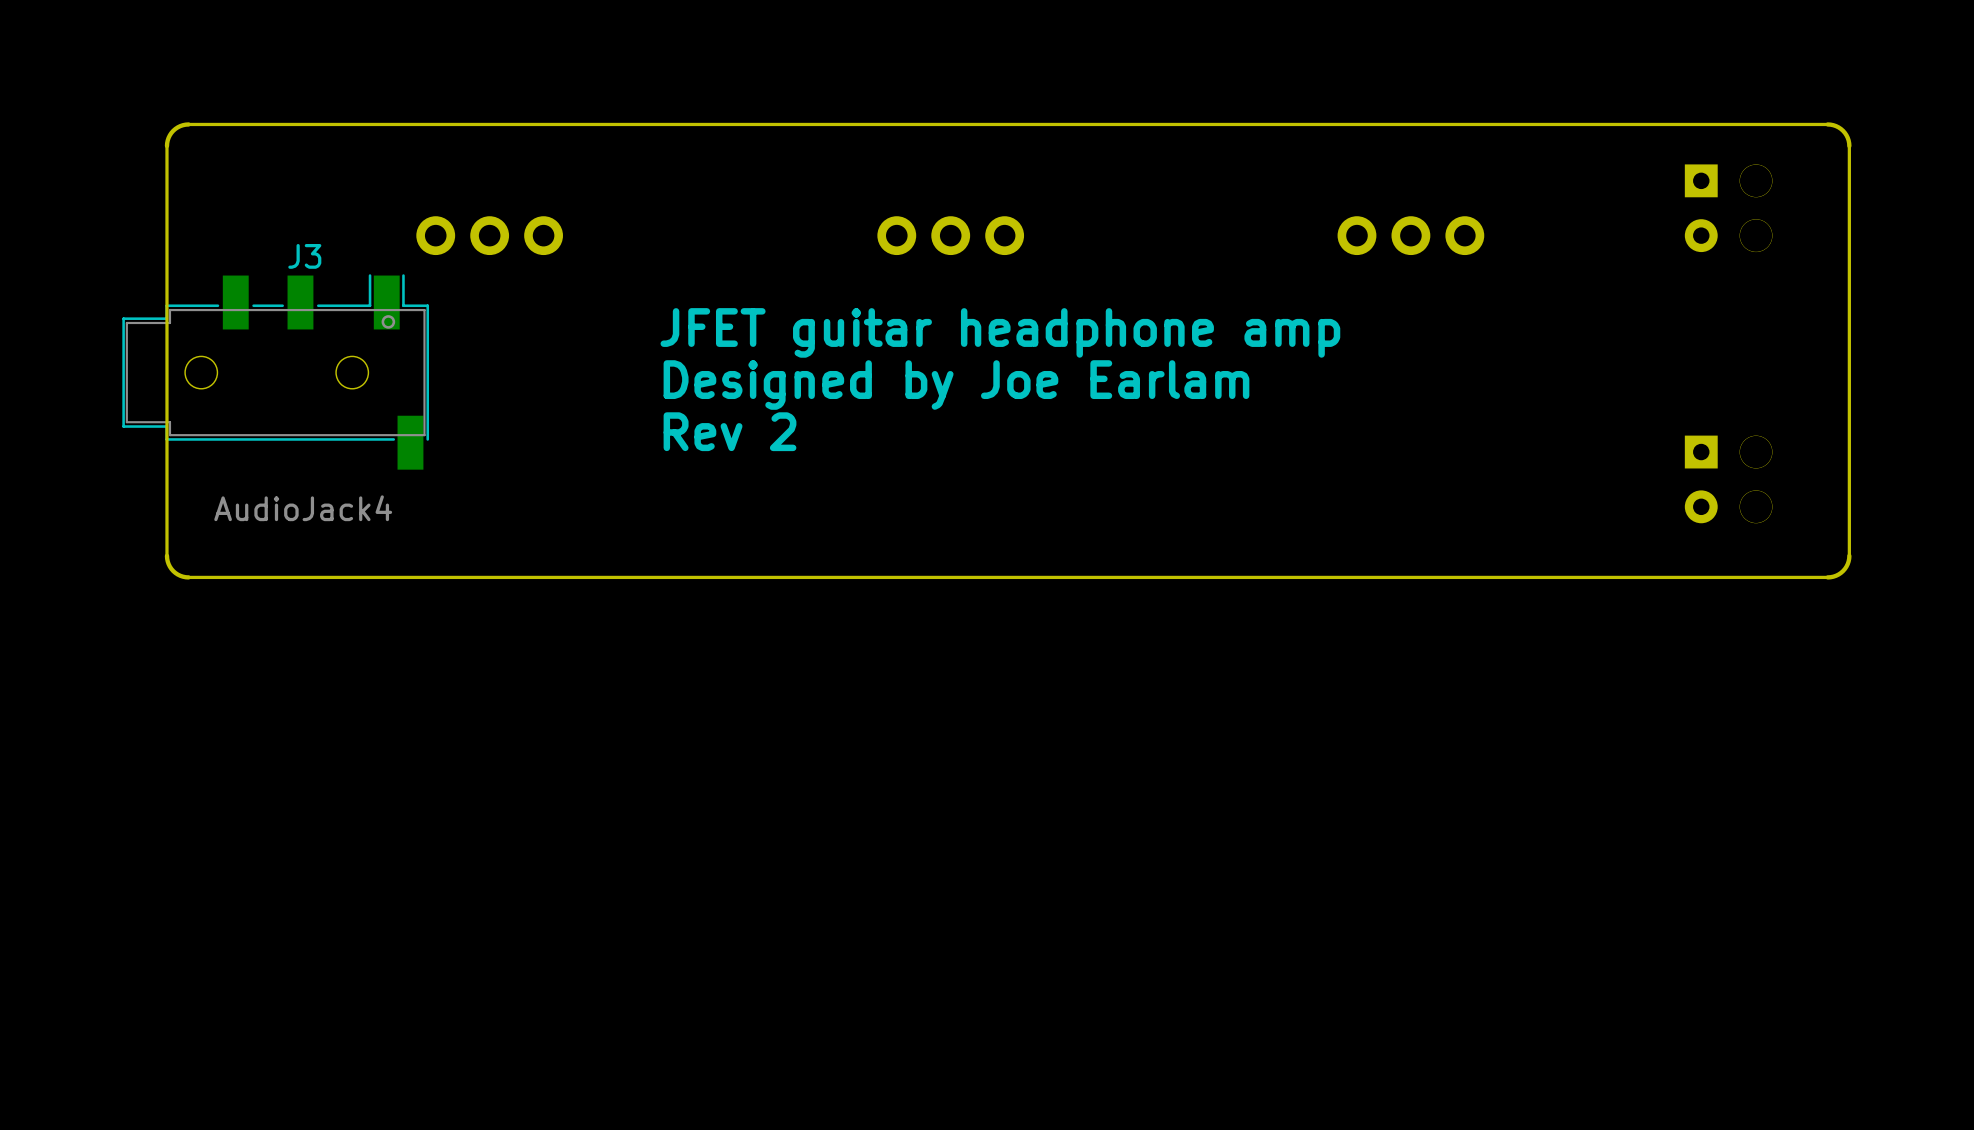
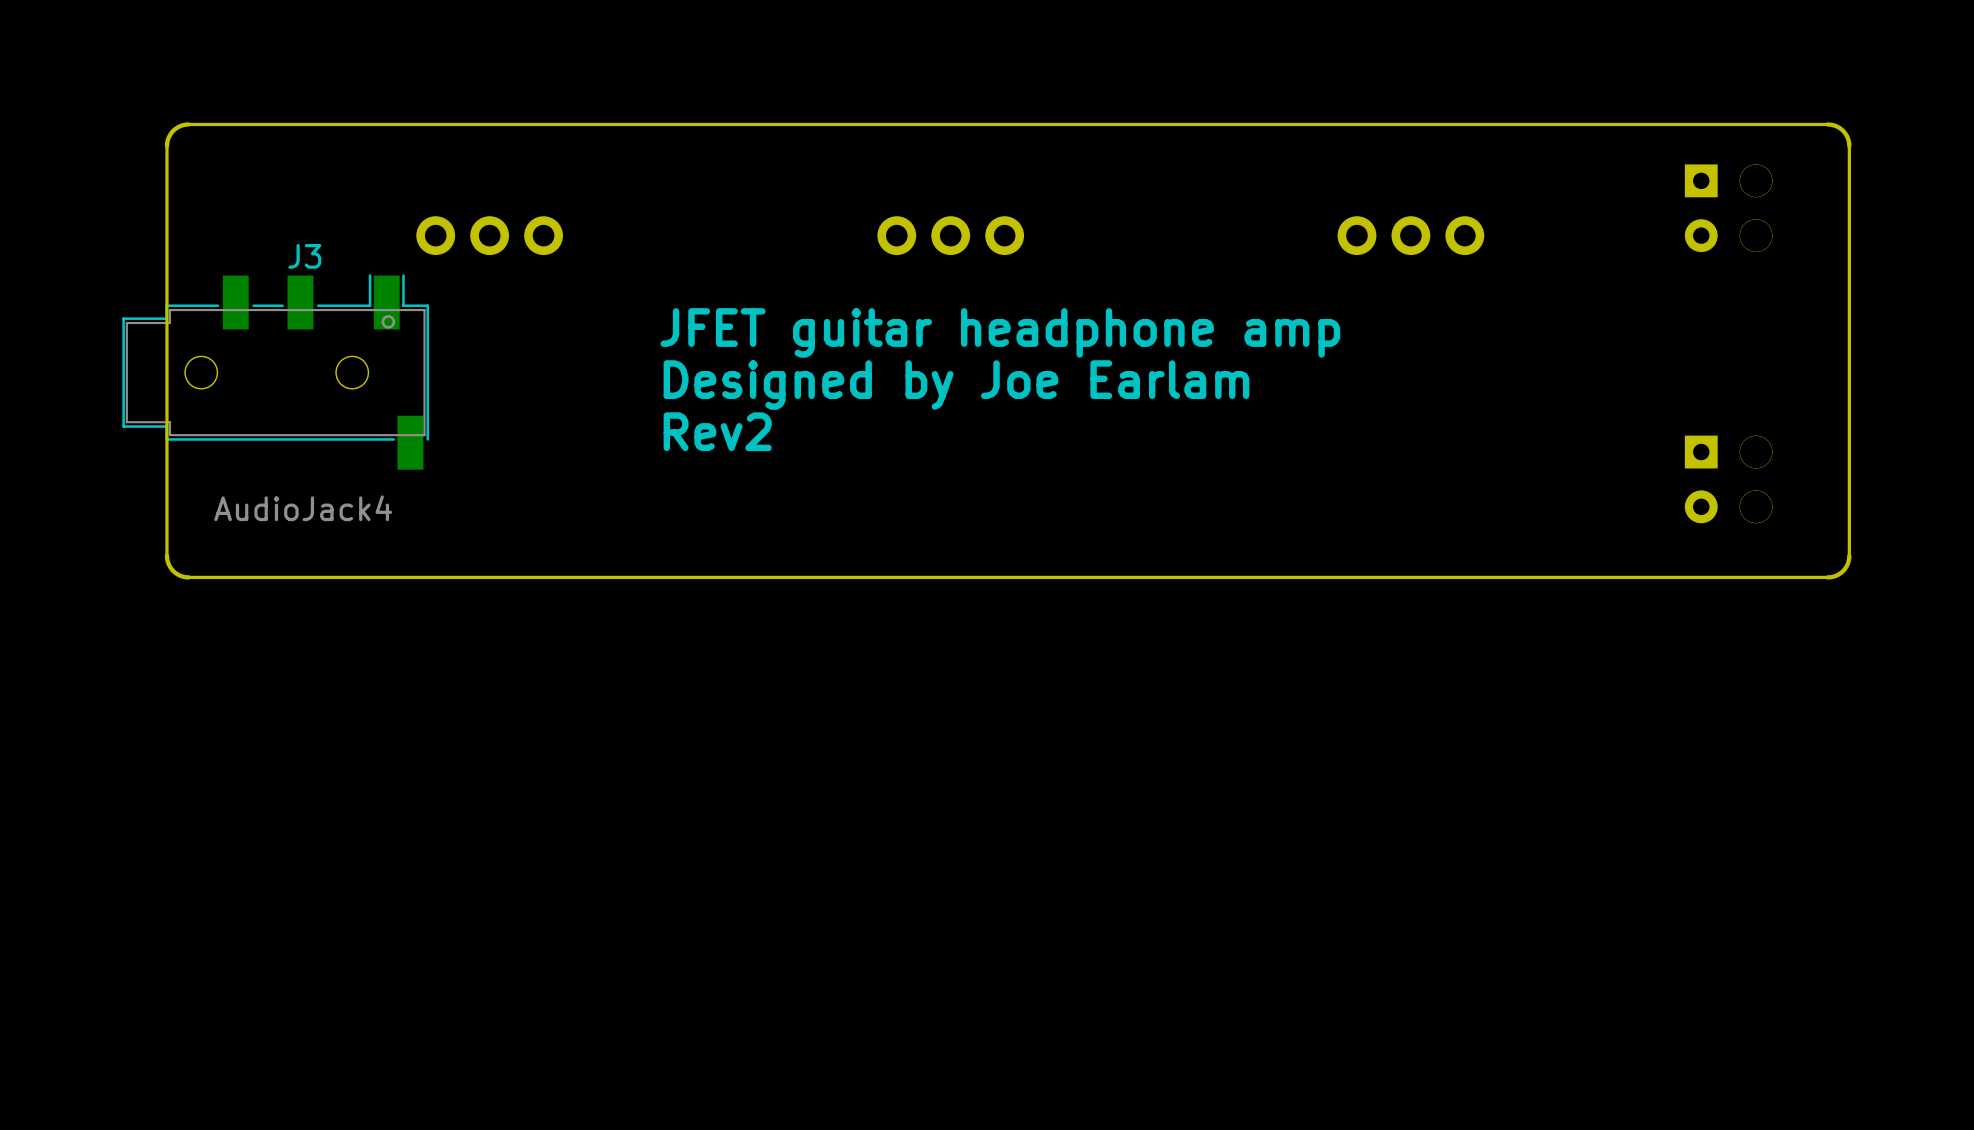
text: Rev 2 (730, 431) -> Rev2 (717, 431)

